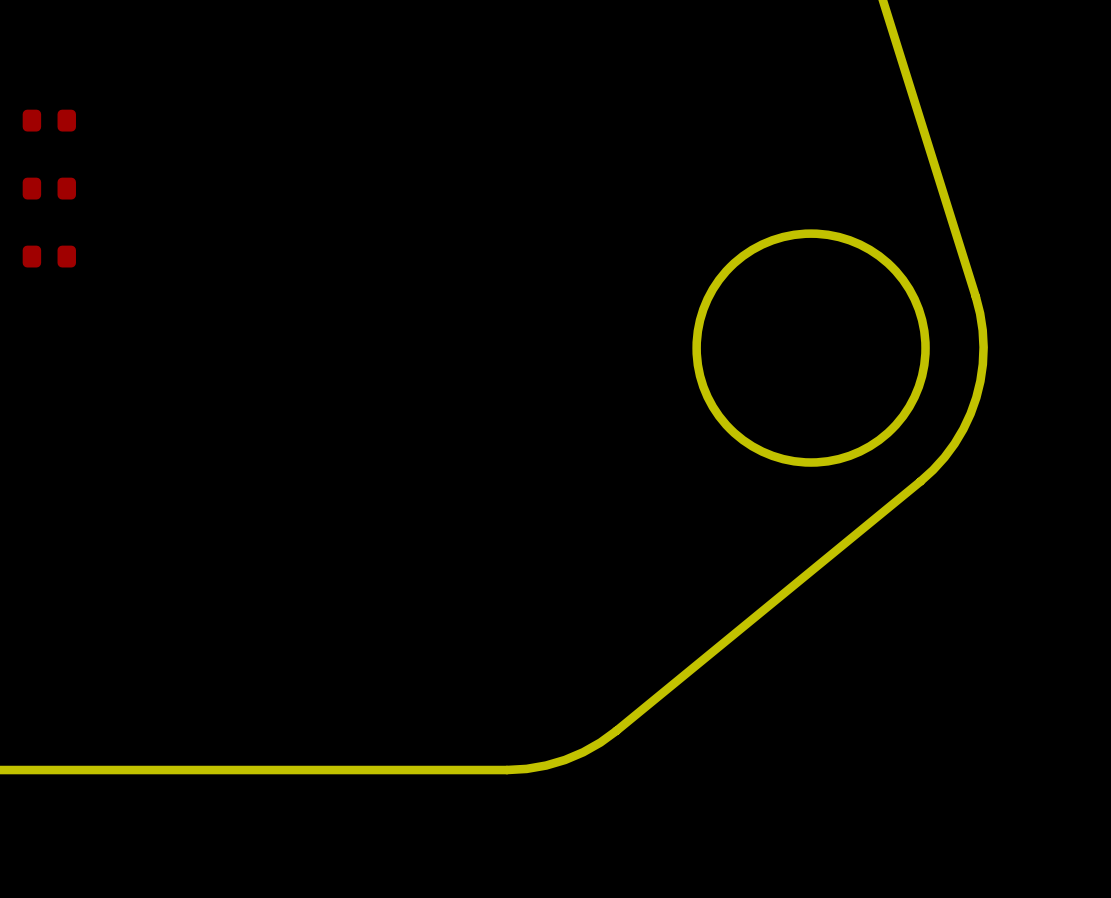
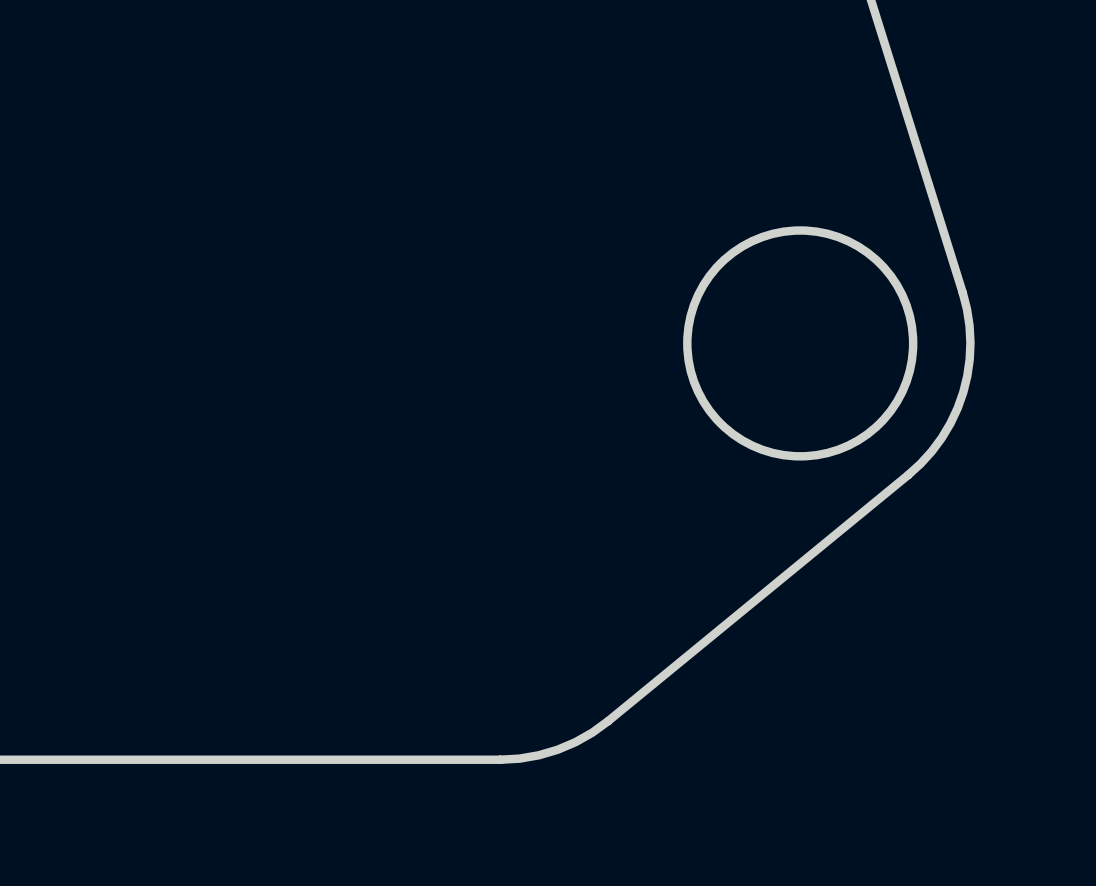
part: (49, 120) -> none
part: (49, 188) -> none
part: (49, 256) -> none

